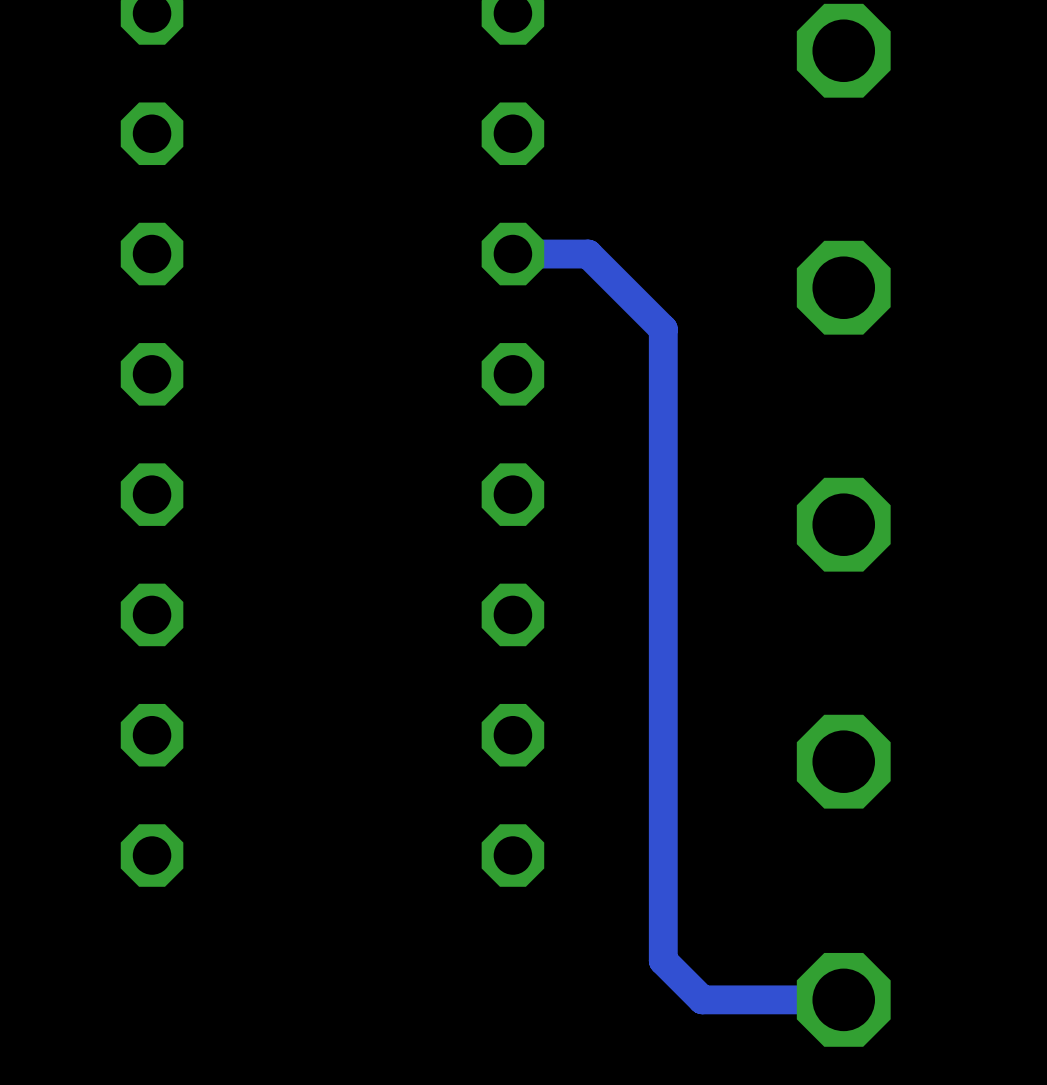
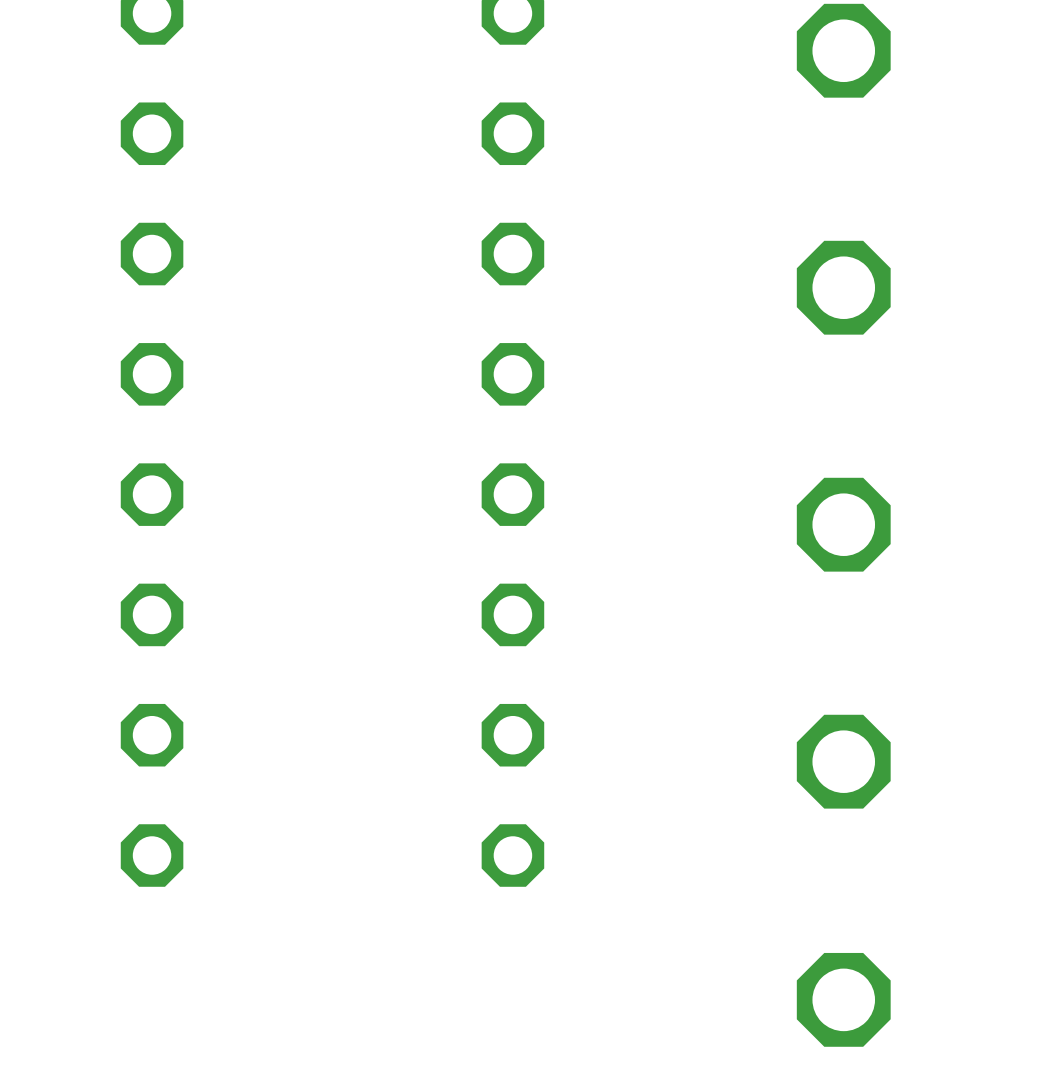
track: (512, 254) (588, 254) (663, 329) (663, 960) (702, 999) (843, 999) -> none

